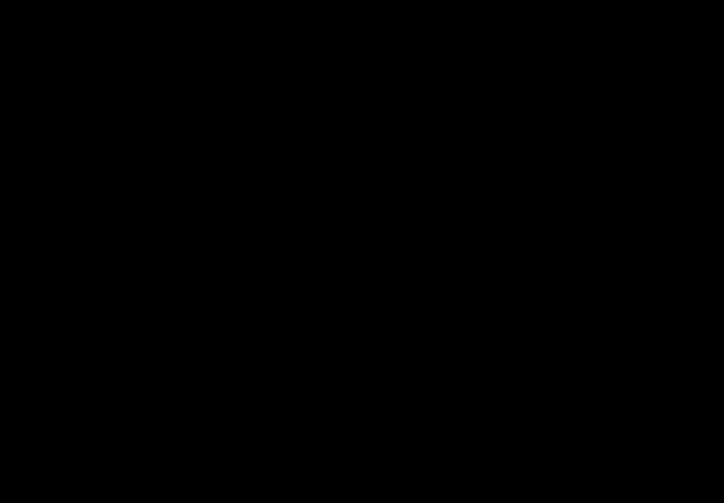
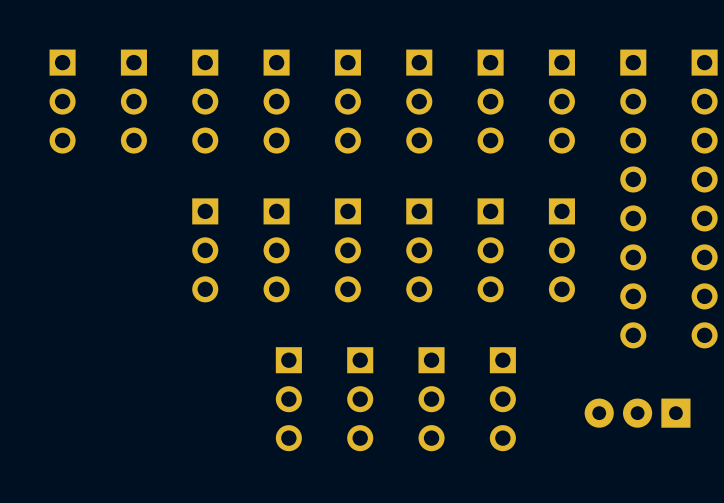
part: none -> (62, 101)
part: none -> (133, 101)
part: none -> (205, 101)
part: none -> (276, 101)
part: none -> (347, 101)
part: none -> (419, 101)
part: none -> (490, 101)
part: none -> (561, 101)
part: none -> (633, 198)
part: none -> (704, 198)
part: none -> (205, 250)
part: none -> (276, 250)
part: none -> (347, 250)
part: none -> (419, 250)
part: none -> (490, 250)
part: none -> (561, 250)
part: none -> (288, 399)
part: none -> (360, 399)
part: none -> (431, 399)
part: none -> (502, 399)
part: none -> (637, 413)

